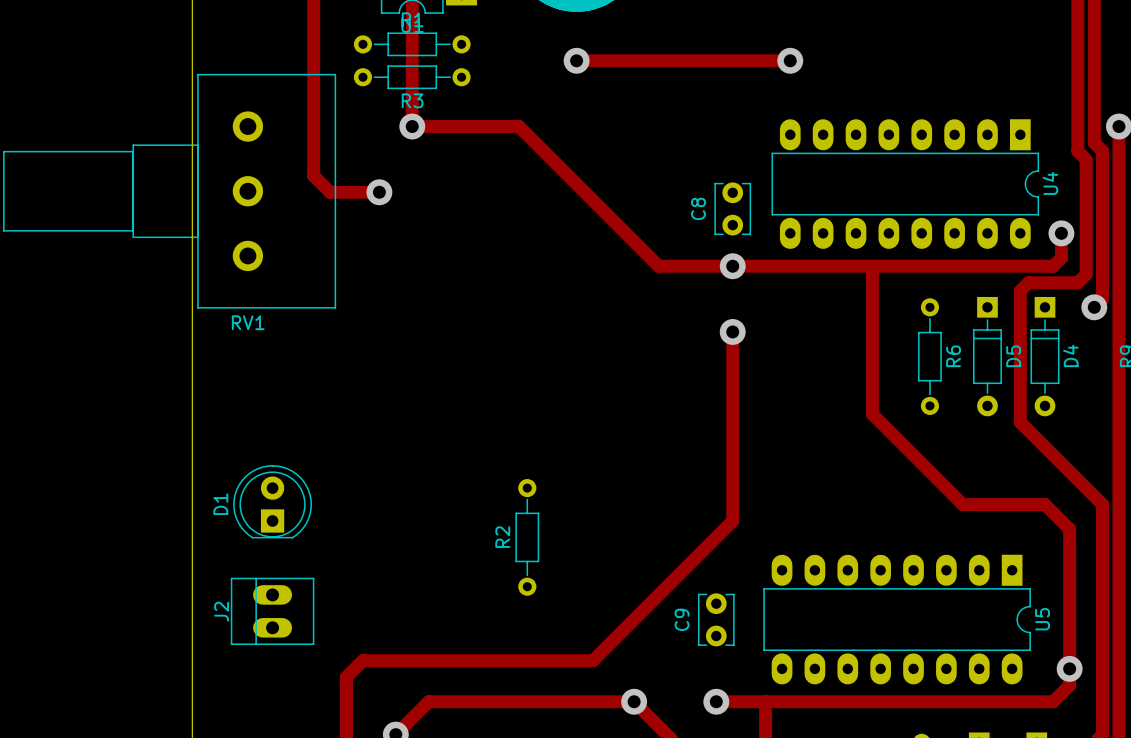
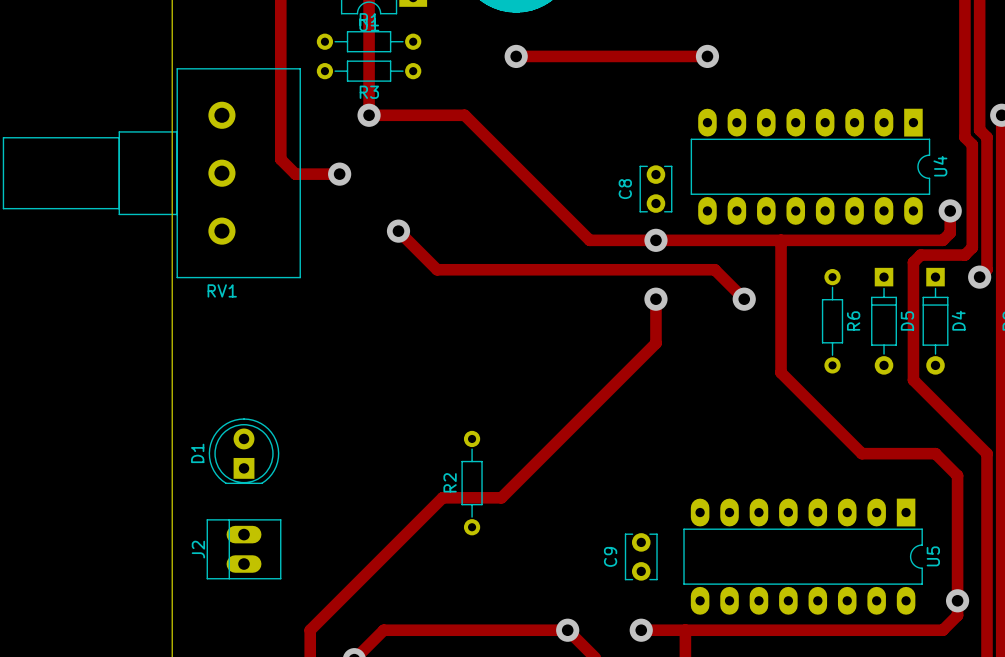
track: none -> (398, 231) (437, 269) (714, 269) (744, 299)
via: none -> (398, 231)
via: none -> (744, 299)
track: (732, 381) (732, 520) (593, 660) (362, 660) (346, 677) (346, 701) -> (655, 343) (501, 497) (442, 497) (310, 630)

